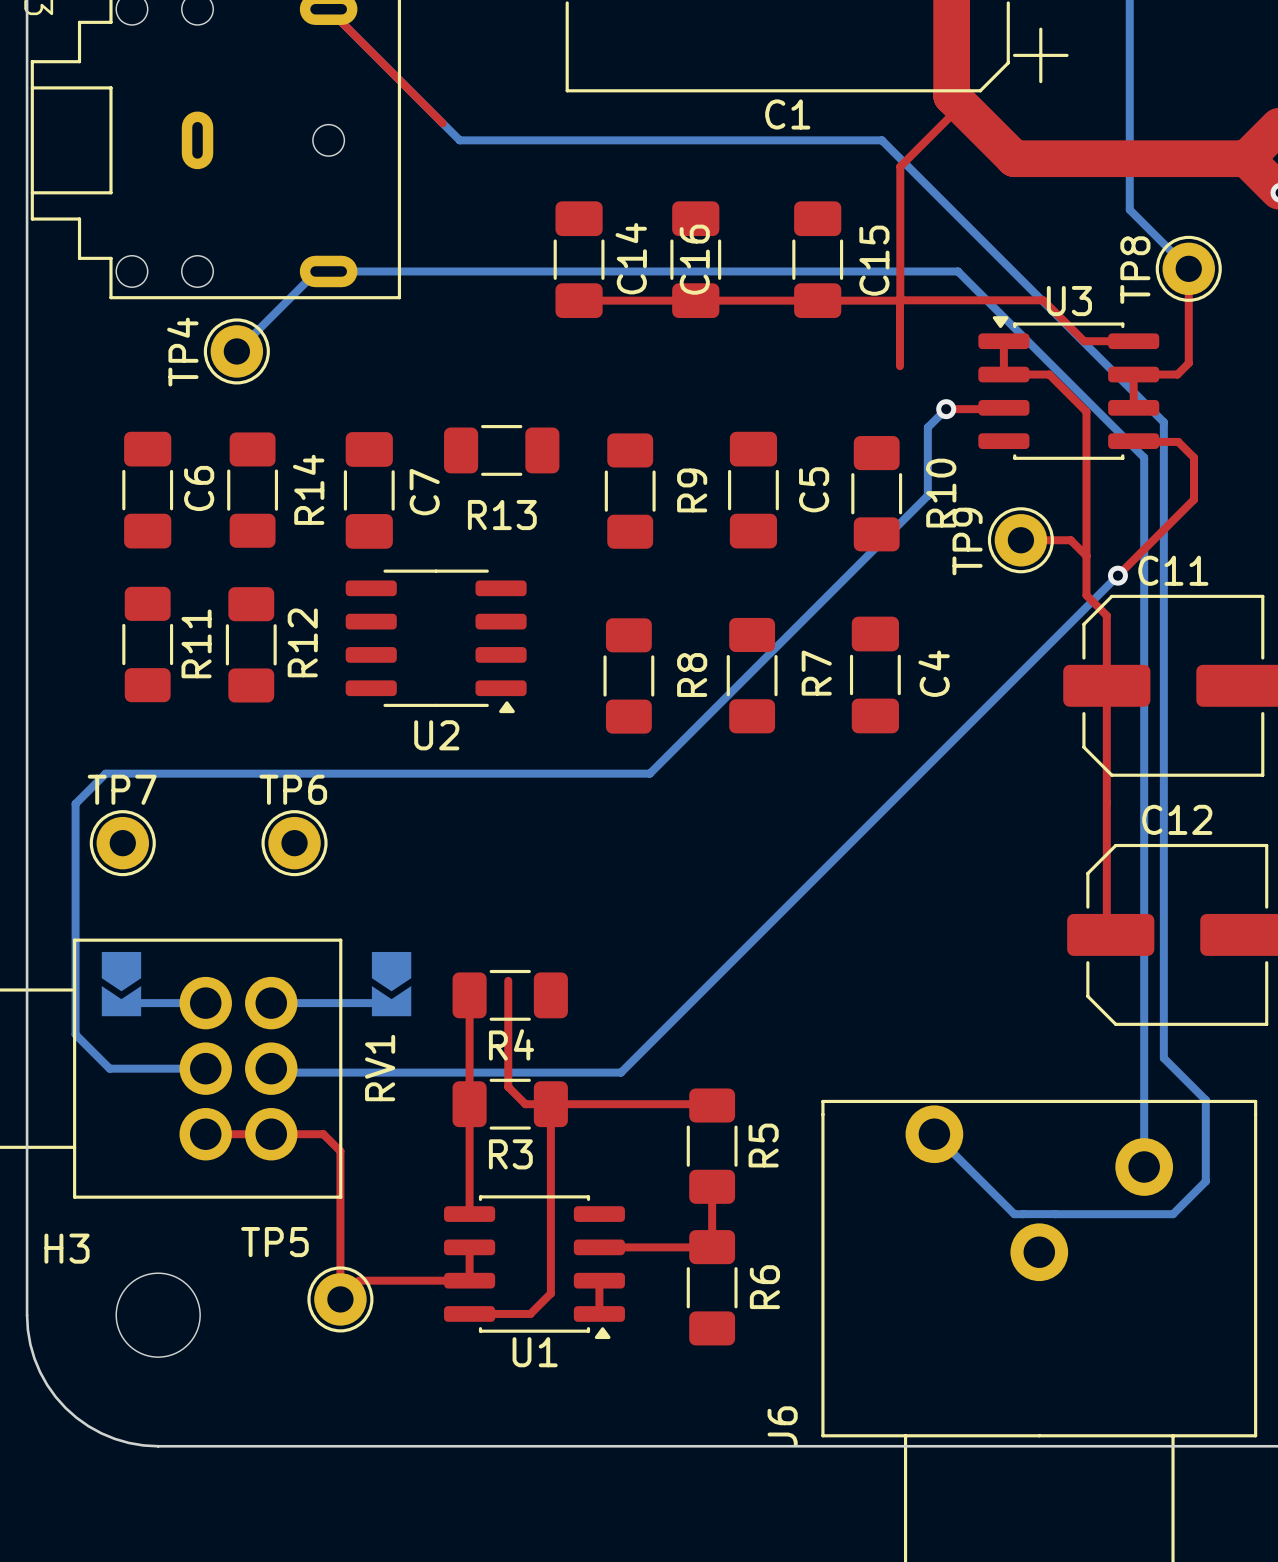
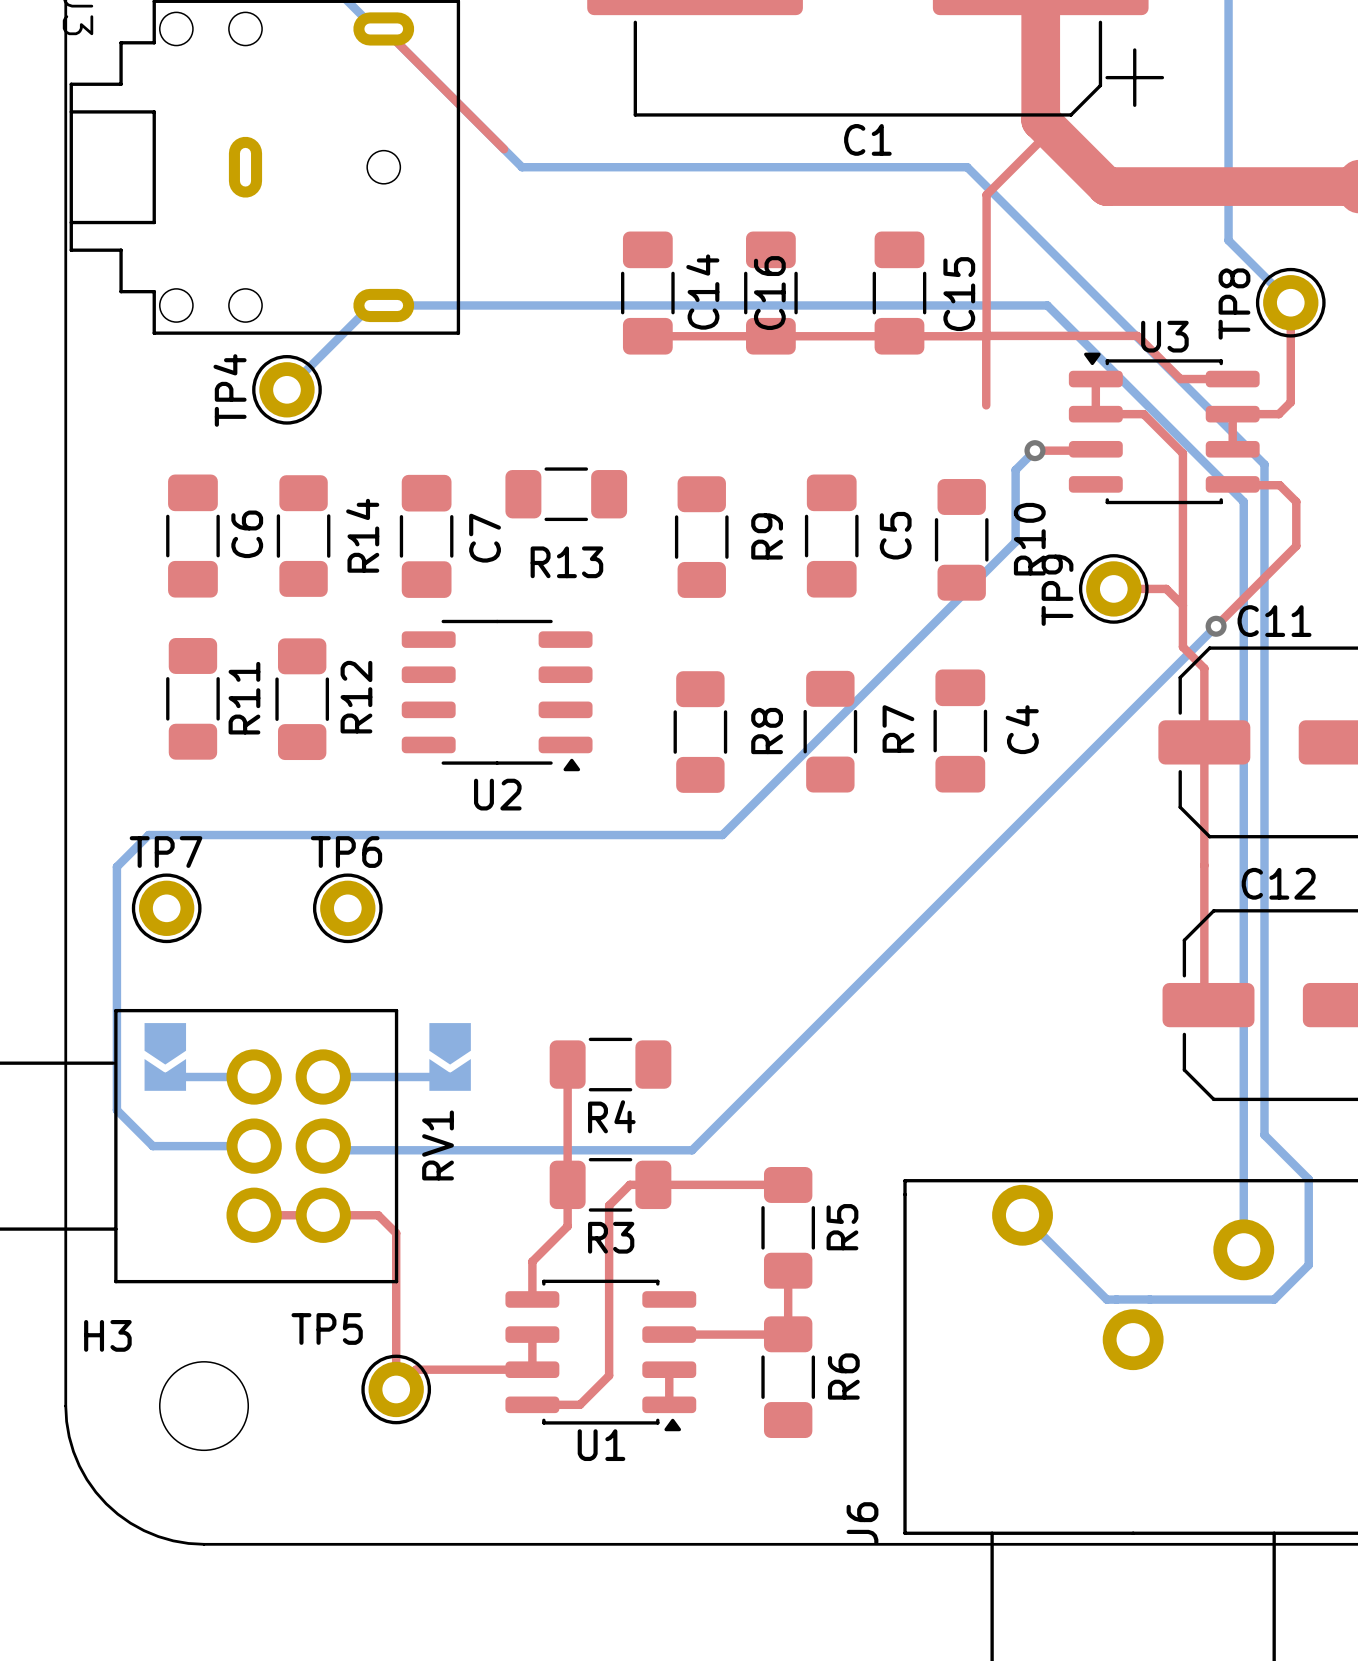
top track: (508, 980) (508, 1087) (525, 1104) (710, 1104) -> none
top track: (469, 995) (469, 1178) -> (567, 1064) (567, 1226) (532, 1261)
R4 position: (510, 995) -> (610, 1064)
R3 position: (510, 1104) -> (610, 1184)
top track: (550, 1104) (550, 1293) (530, 1313) (514, 1313) -> (788, 1184) (629, 1184) (609, 1205) (609, 1375) (579, 1404)

